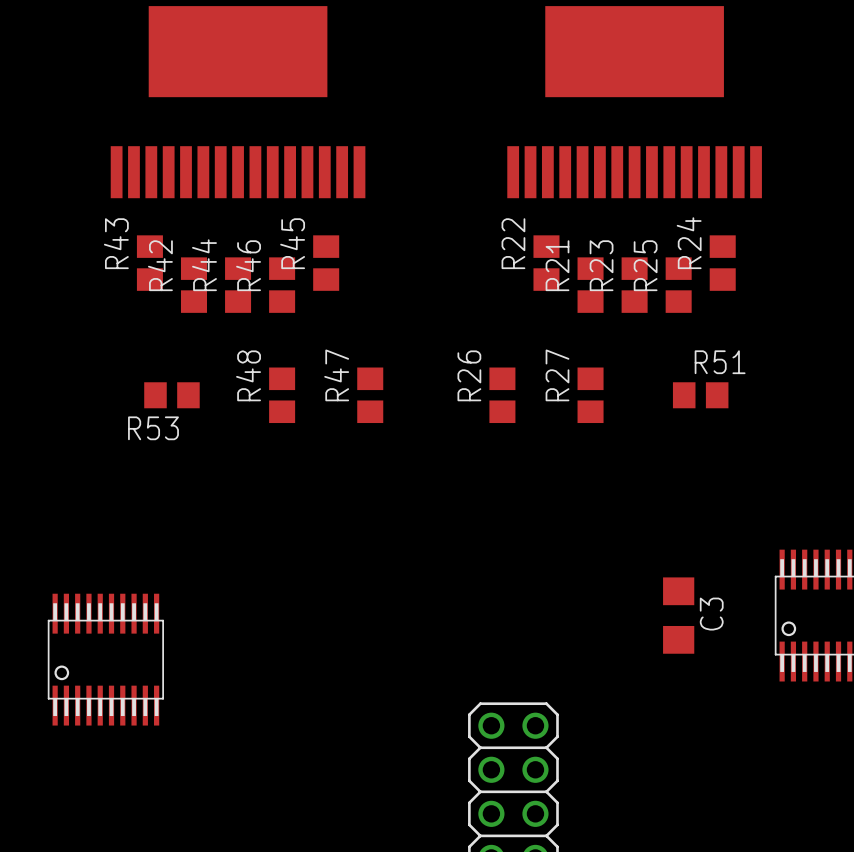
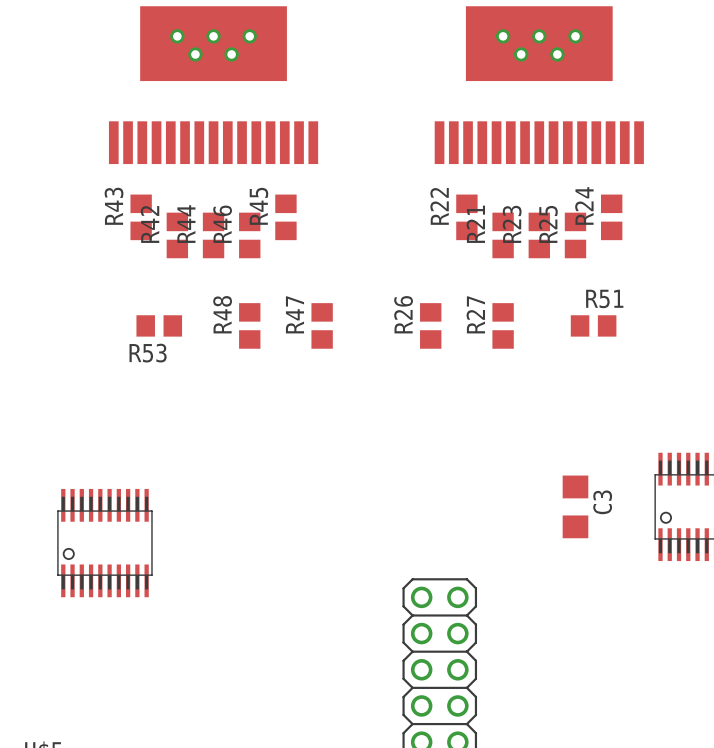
via: none -> (177, 36)
via: none -> (213, 36)
via: none -> (249, 36)
via: none -> (503, 36)
via: none -> (539, 36)
via: none -> (575, 36)
via: none -> (195, 54)
via: none -> (231, 54)
via: none -> (521, 54)
via: none -> (557, 54)

